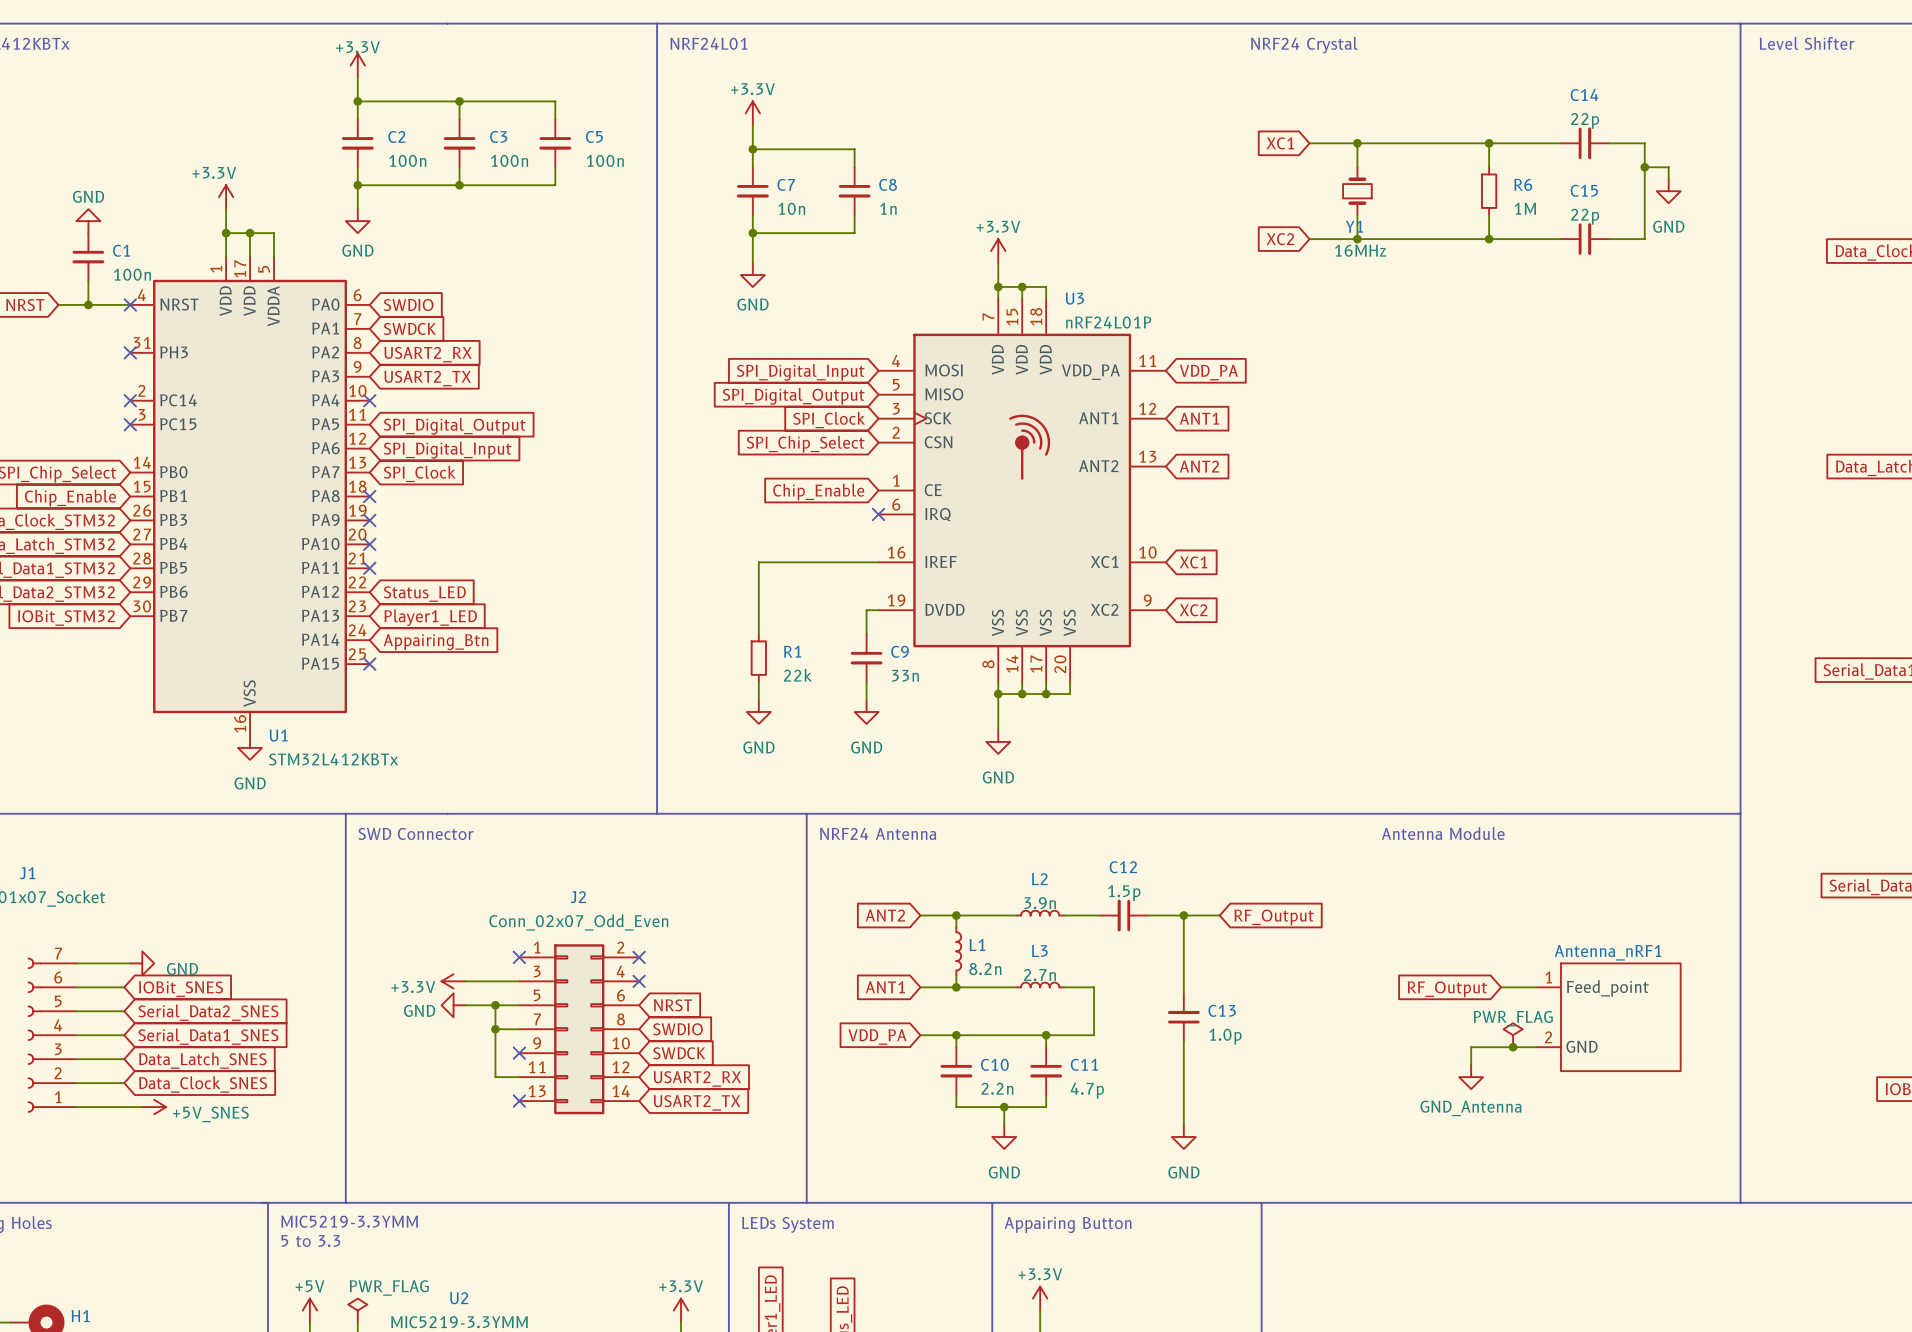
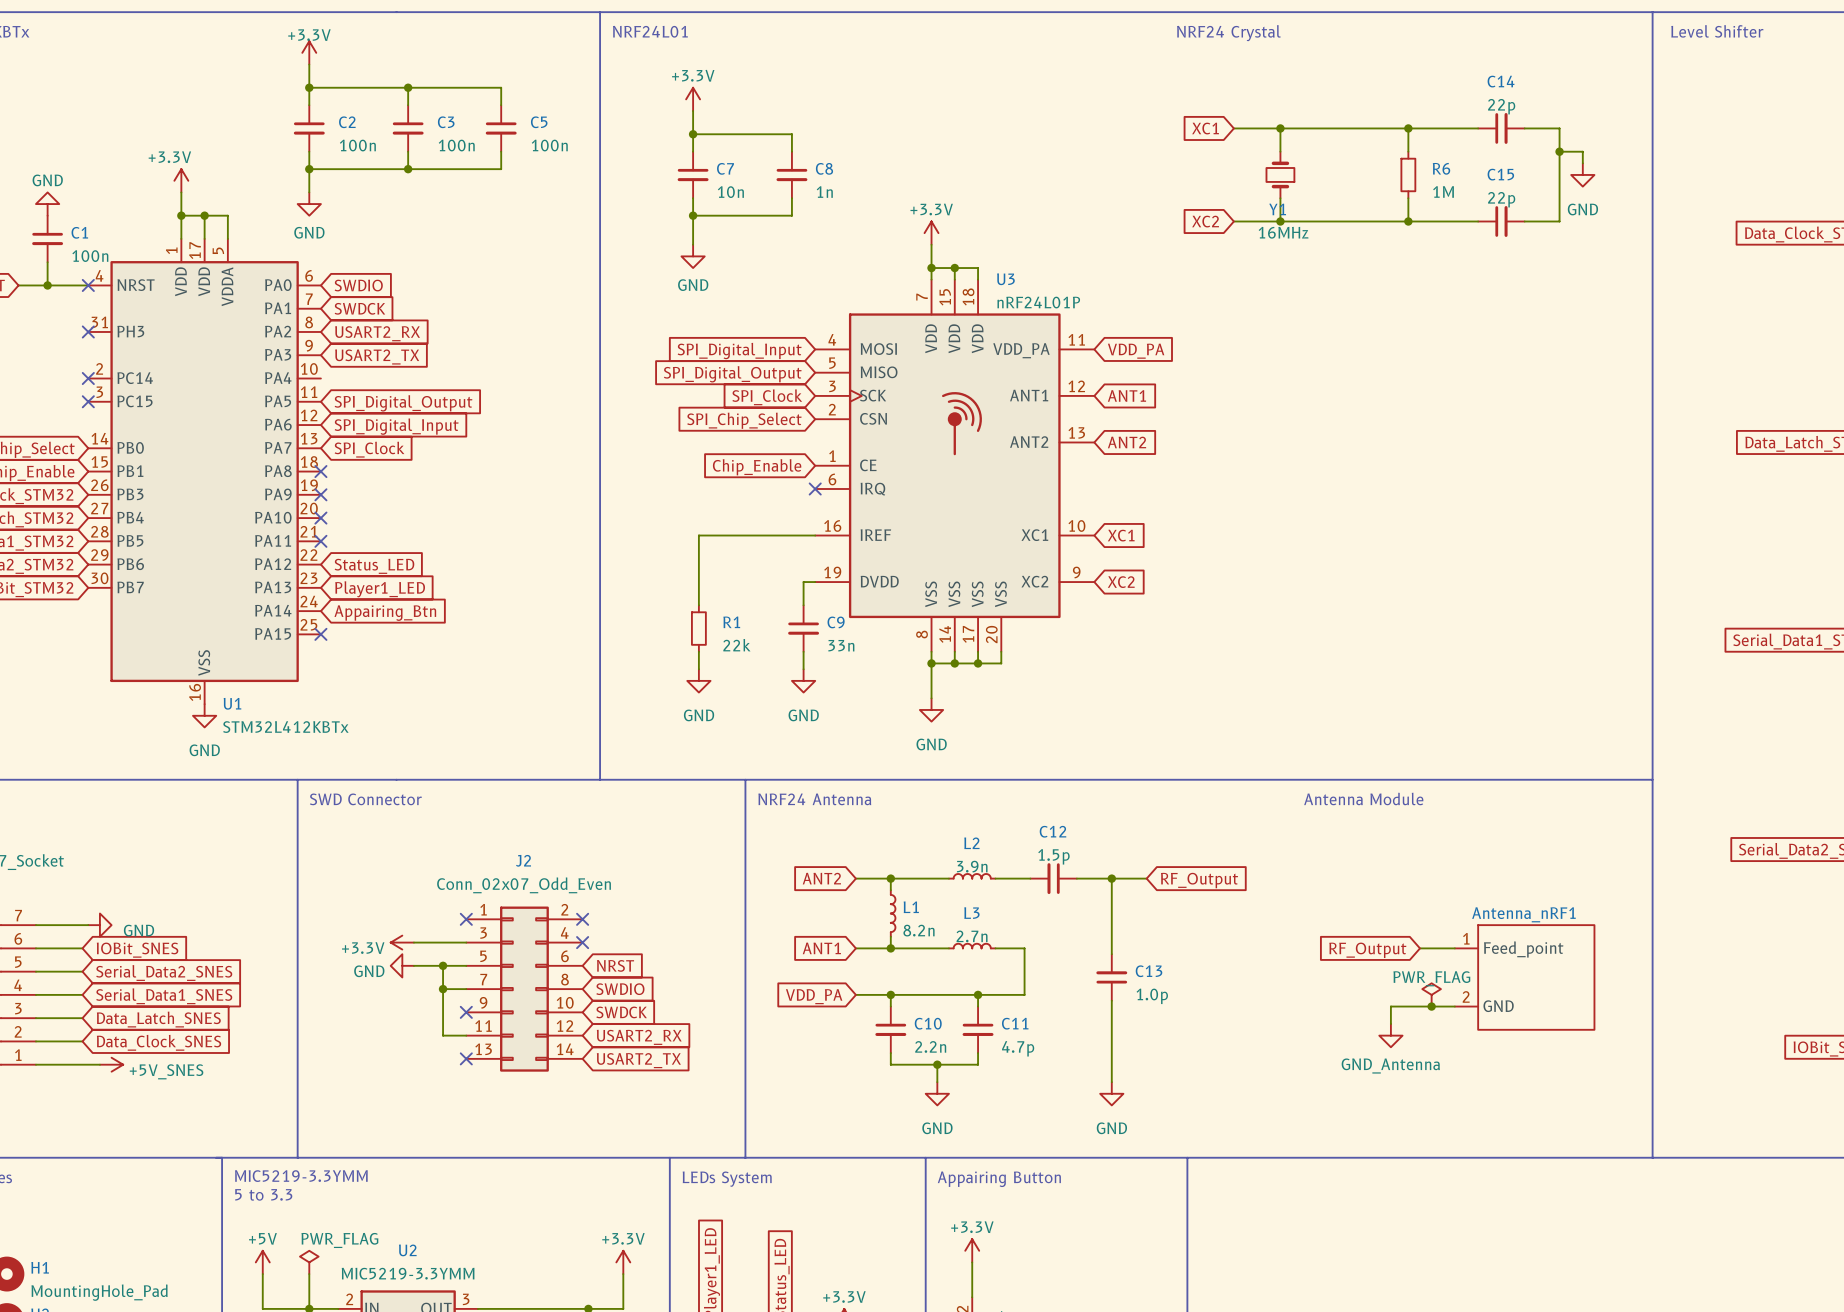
no-connect mark: (369, 400) -> none

